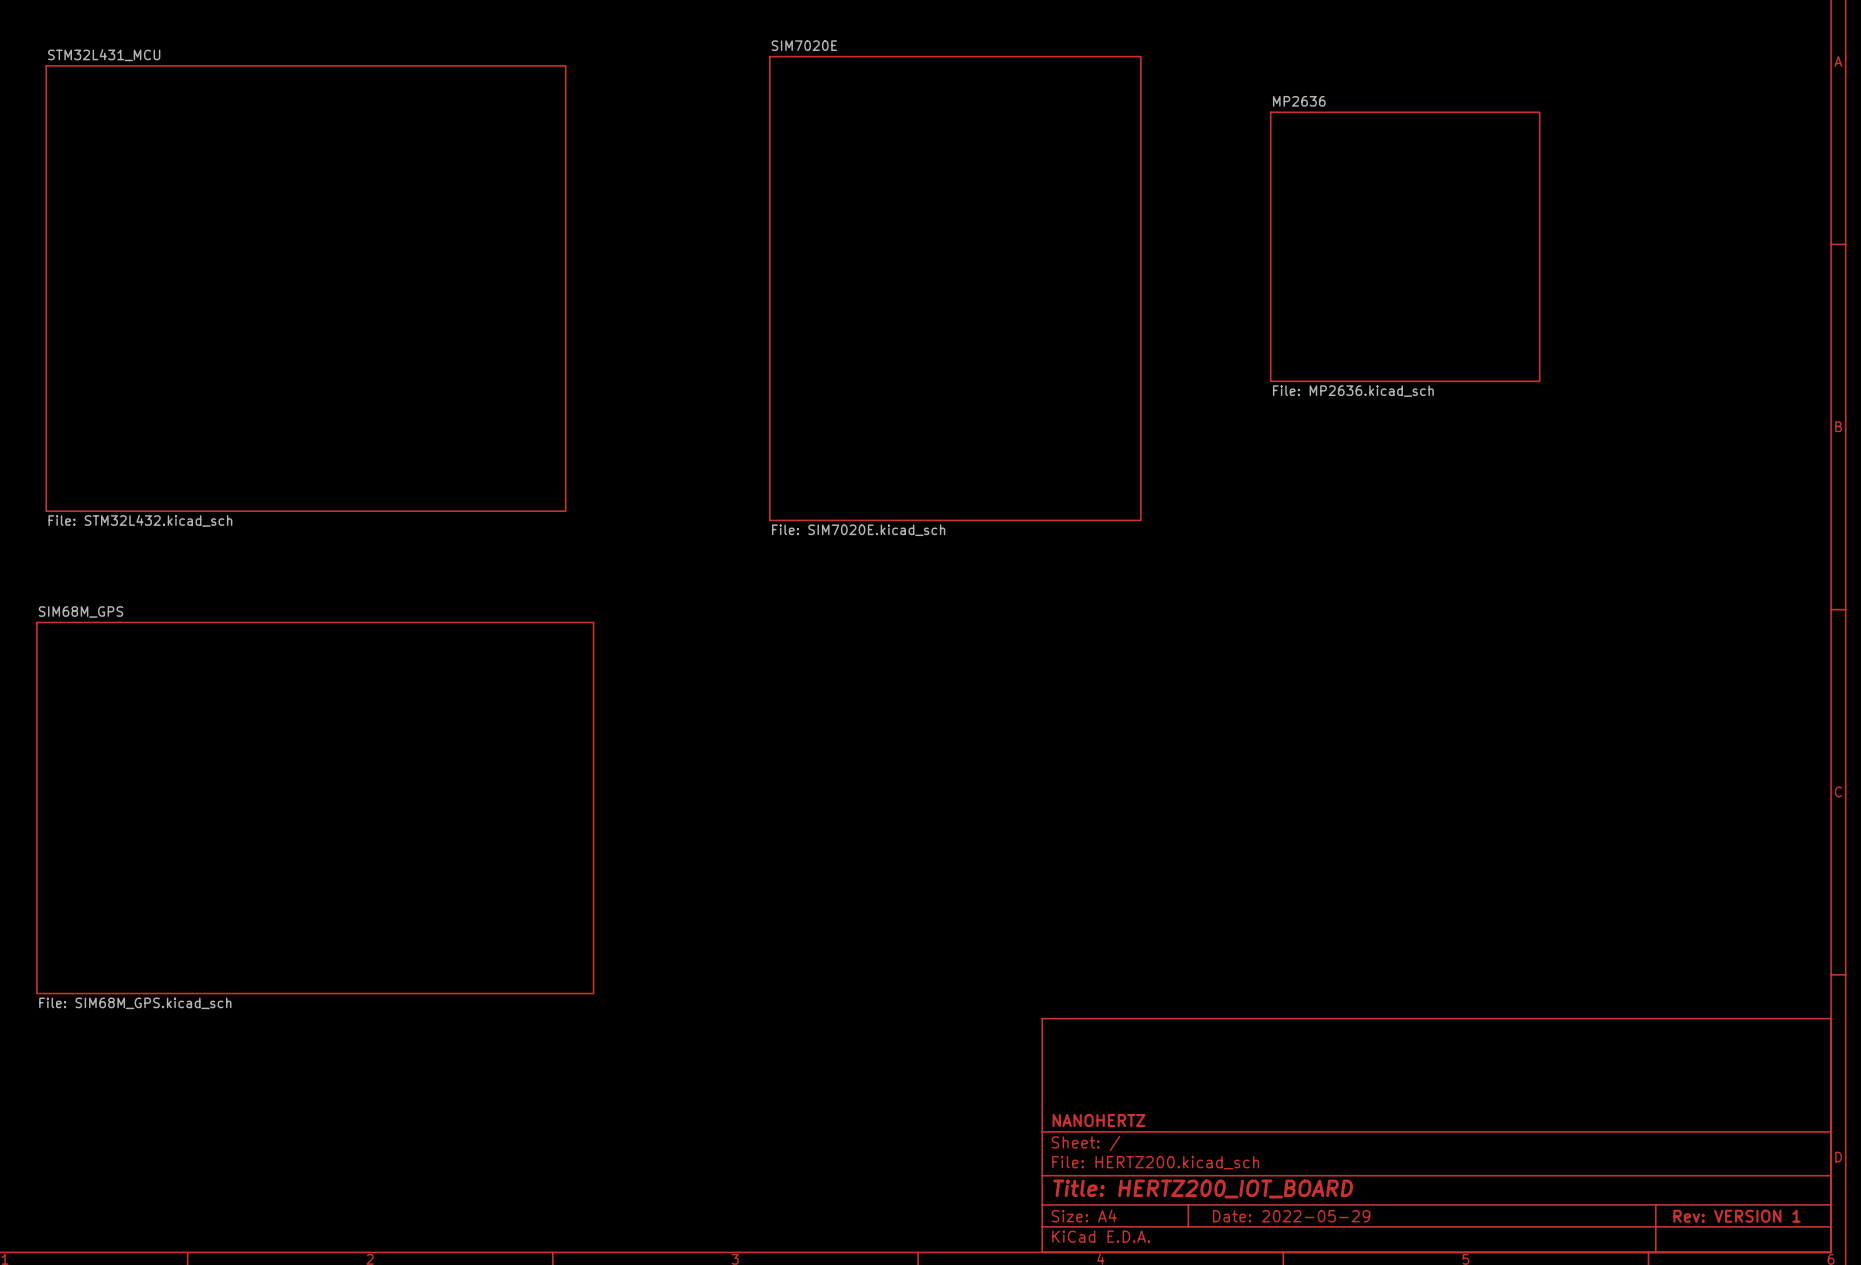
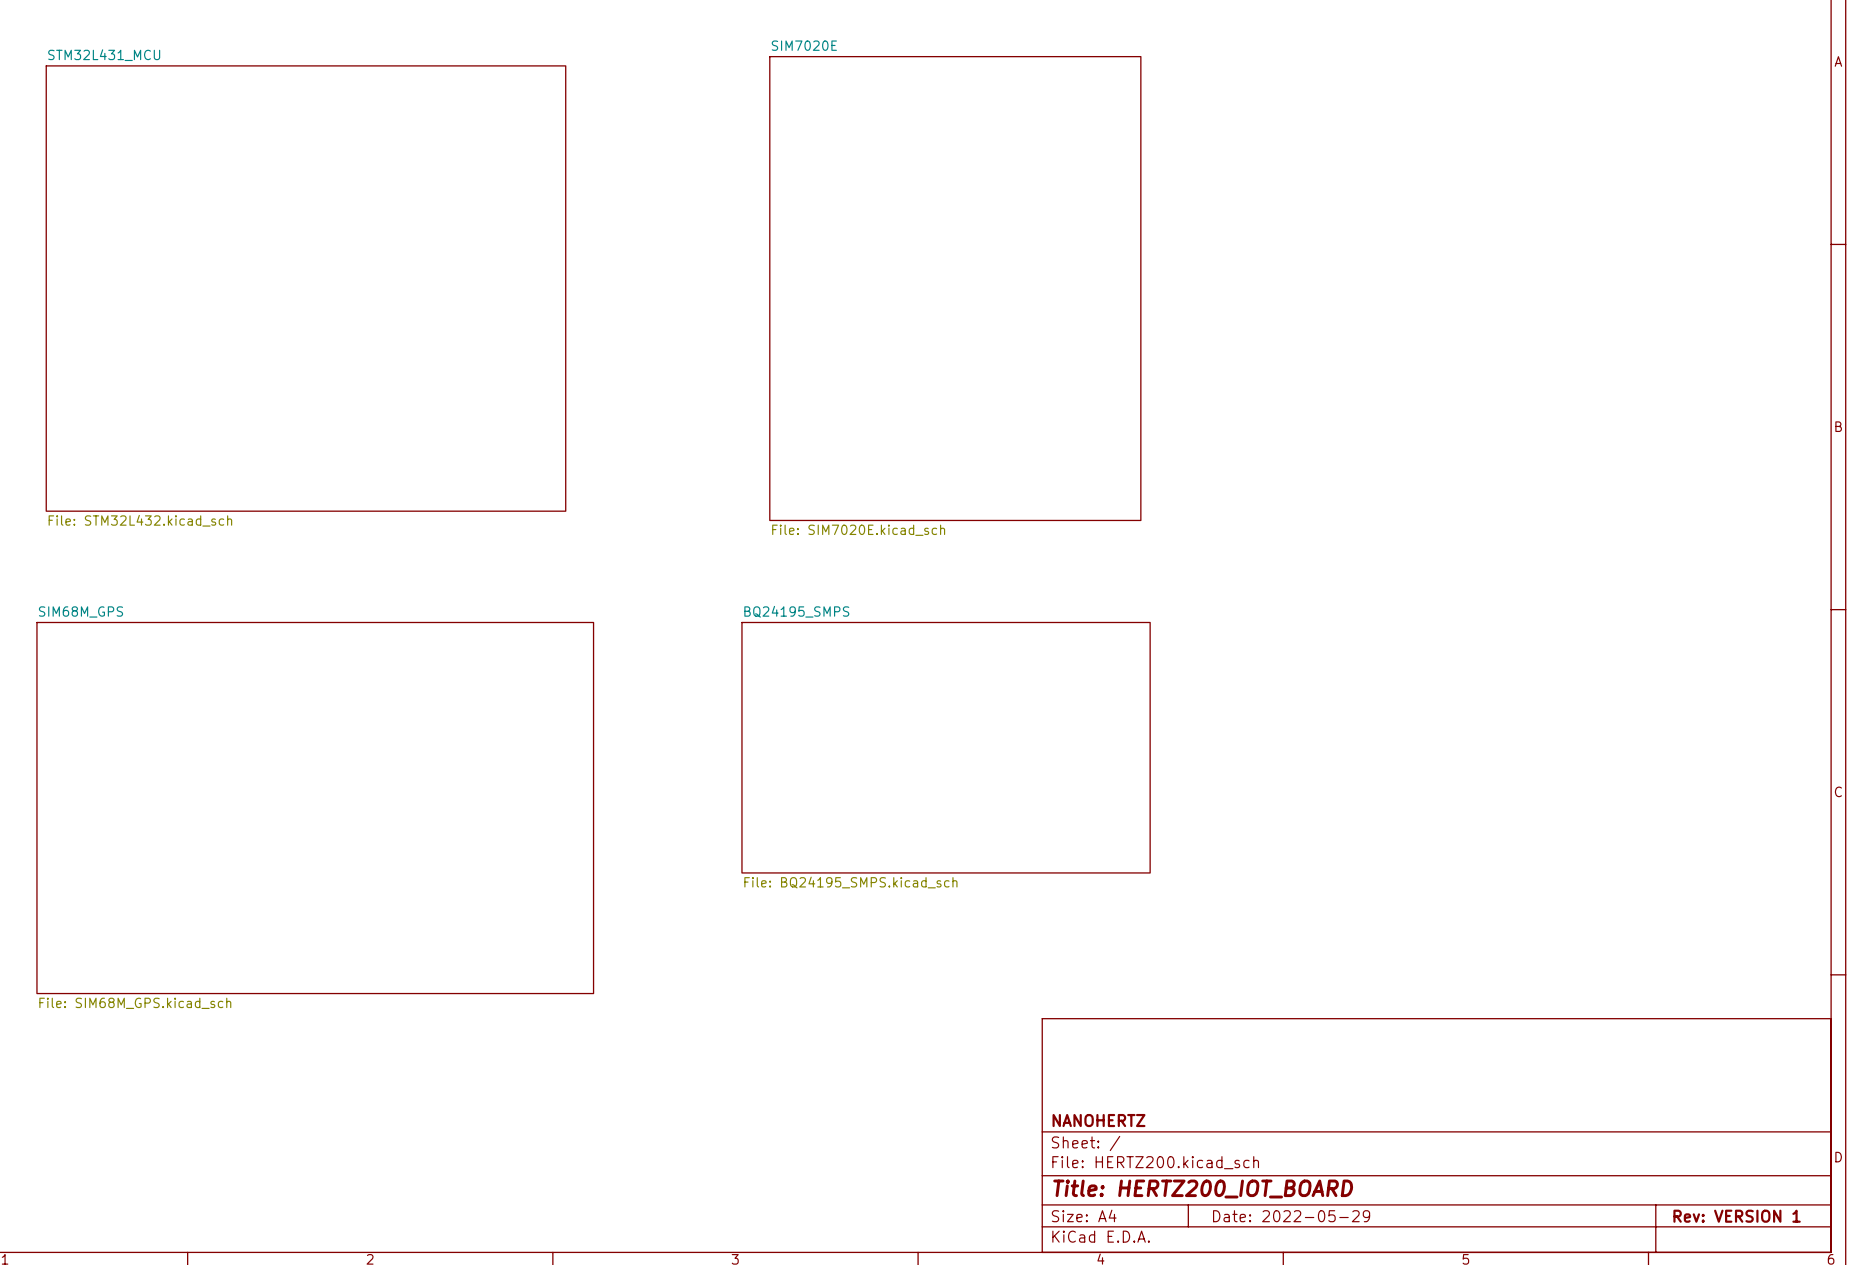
sheet MP2636: File: MP2636.kicad_sch (1405, 246) -> none
sheet BQ24195_SMPS: none -> File: BQ24195_SMPS.kicad_sch (946, 747)

